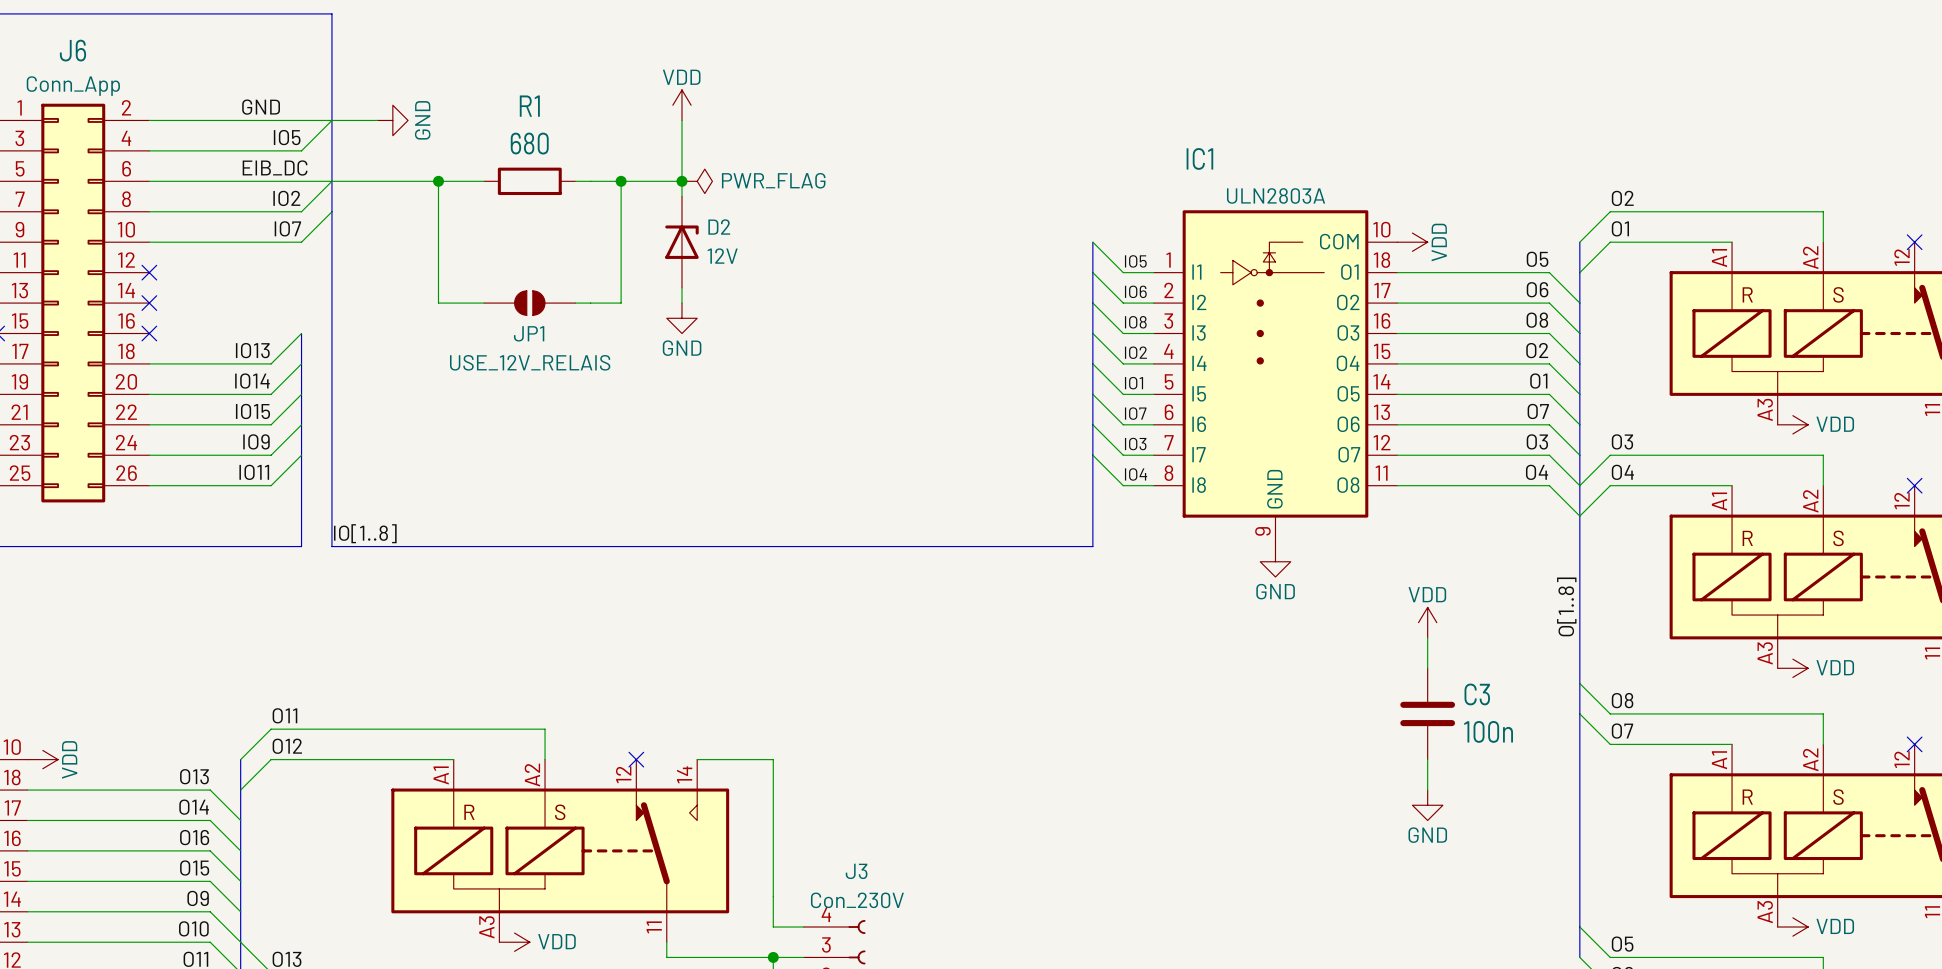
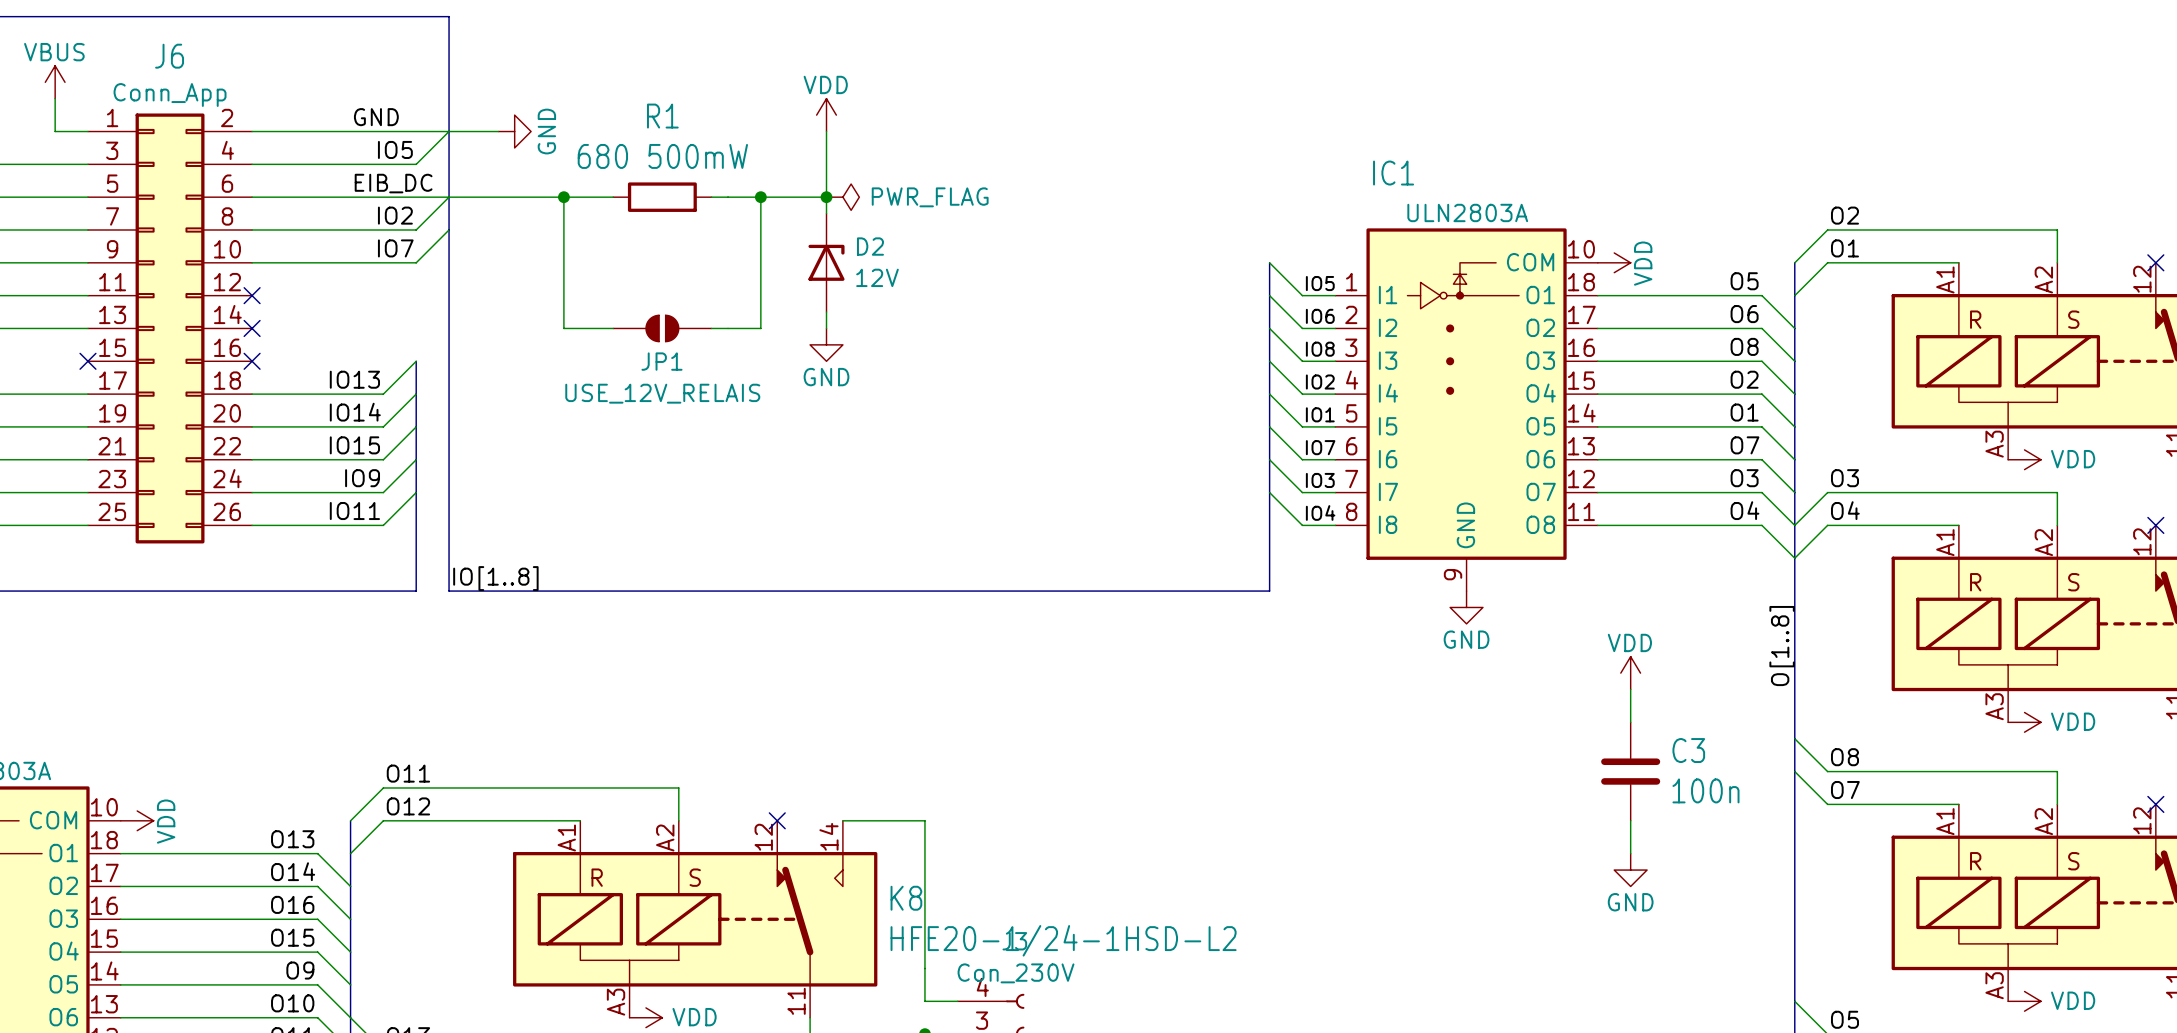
R1 value: 680 (529, 143) -> 680 500mW (662, 156)
K8 name: none -> K8 (906, 898)
K8 value: none -> HFE20-1/24-1HSD-L2 (1063, 940)

